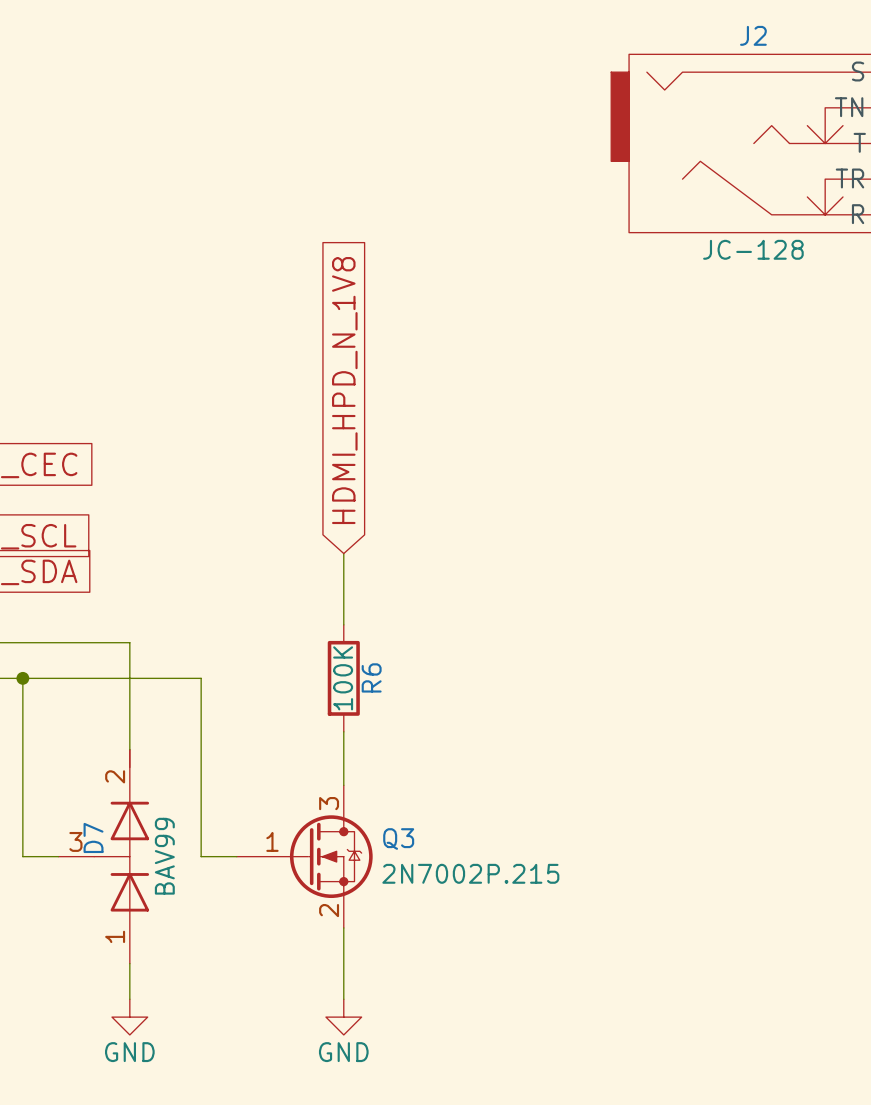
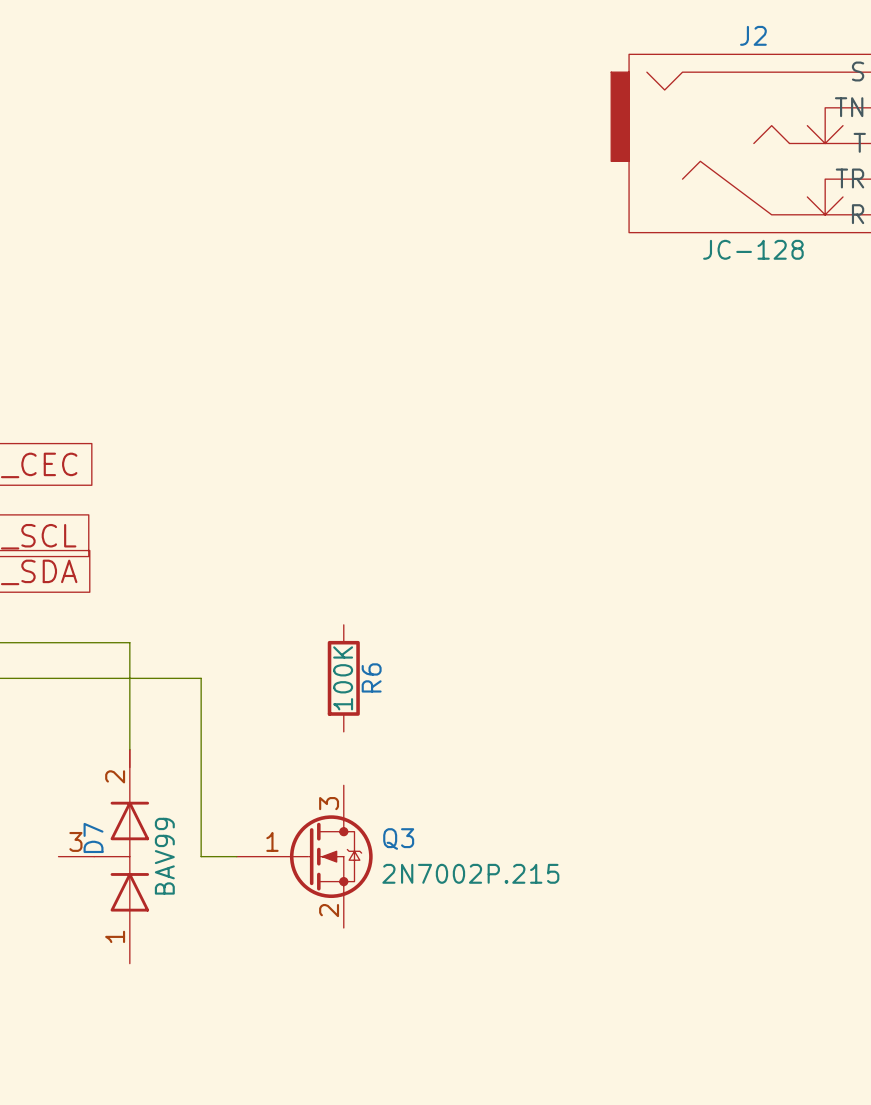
global label: HDMI_HPD_N_1V8 (344, 390) -> none
wire: (343, 553) (343, 624) -> none
wire: (22, 678) (22, 856) (58, 856) -> none
junction: (22, 678) -> none
wire: (343, 731) (343, 785) -> none
wire: (343, 927) (343, 999) -> none
wire: (129, 963) (129, 999) -> none
power symbol: GND (129, 1017) -> none
power symbol: GND (343, 1017) -> none

